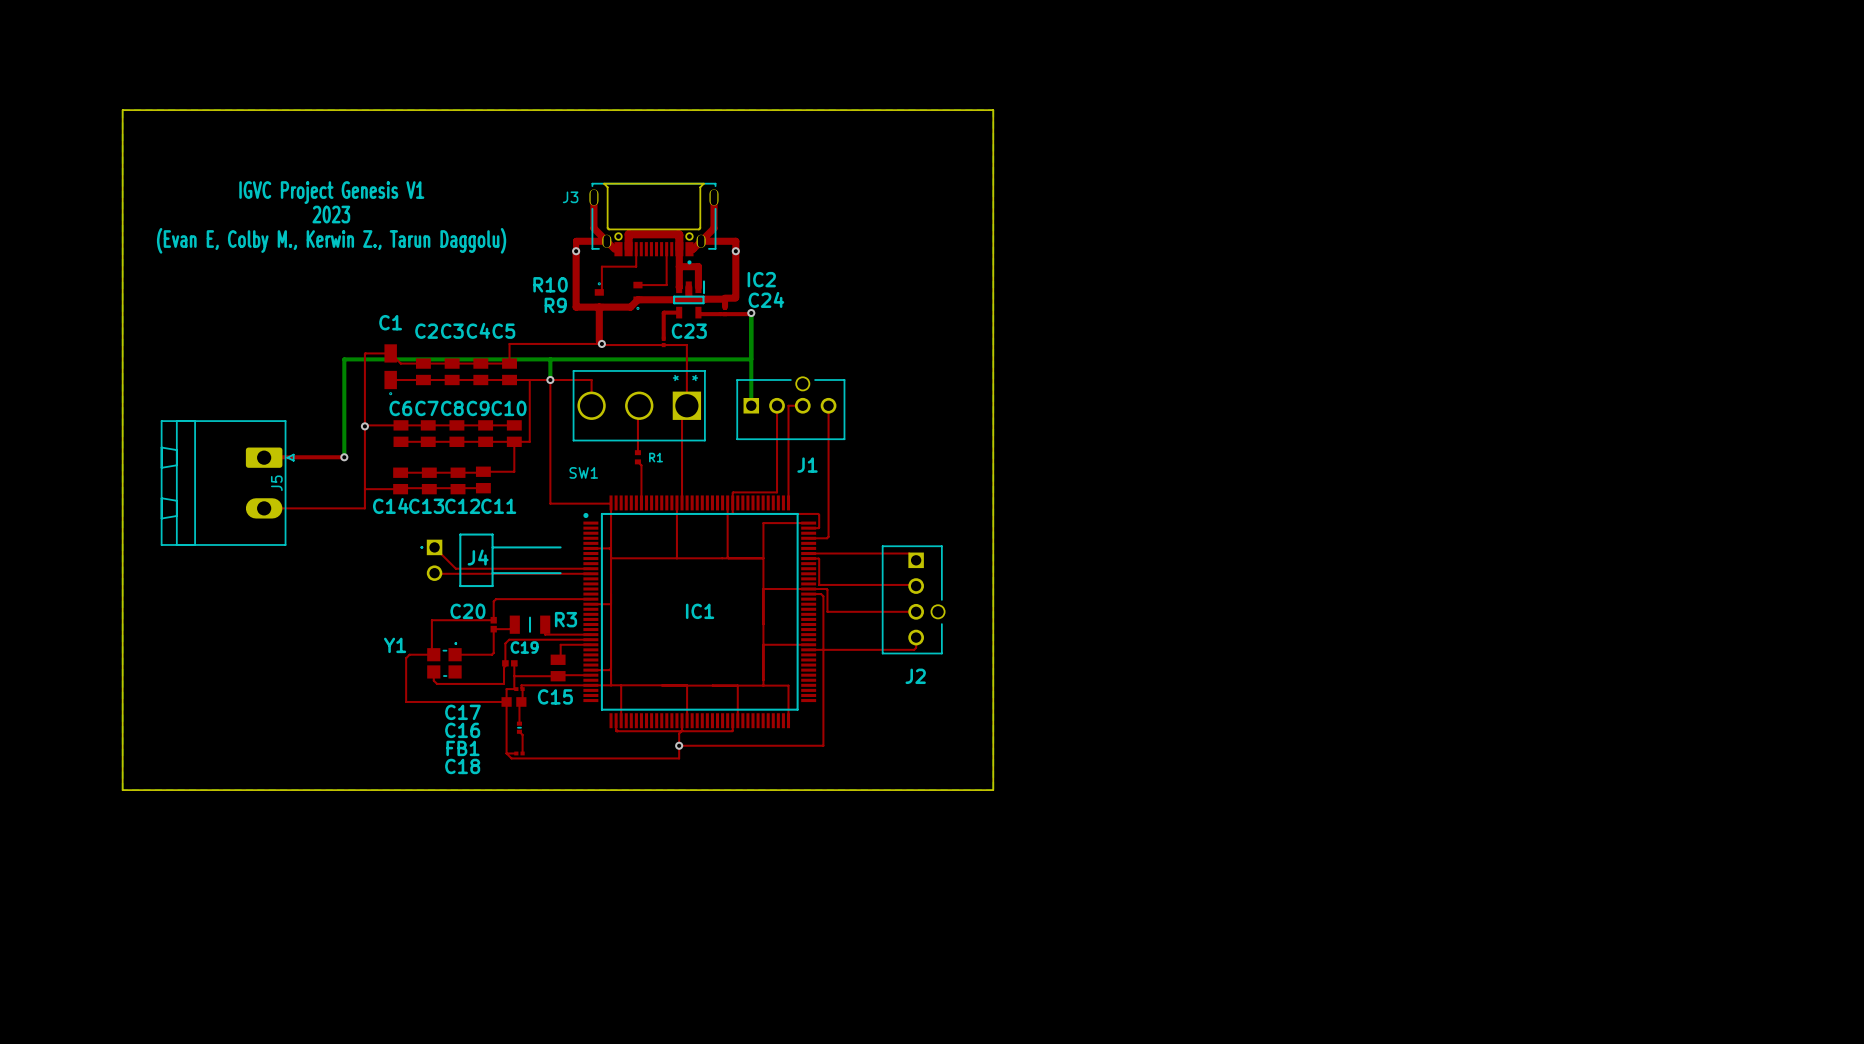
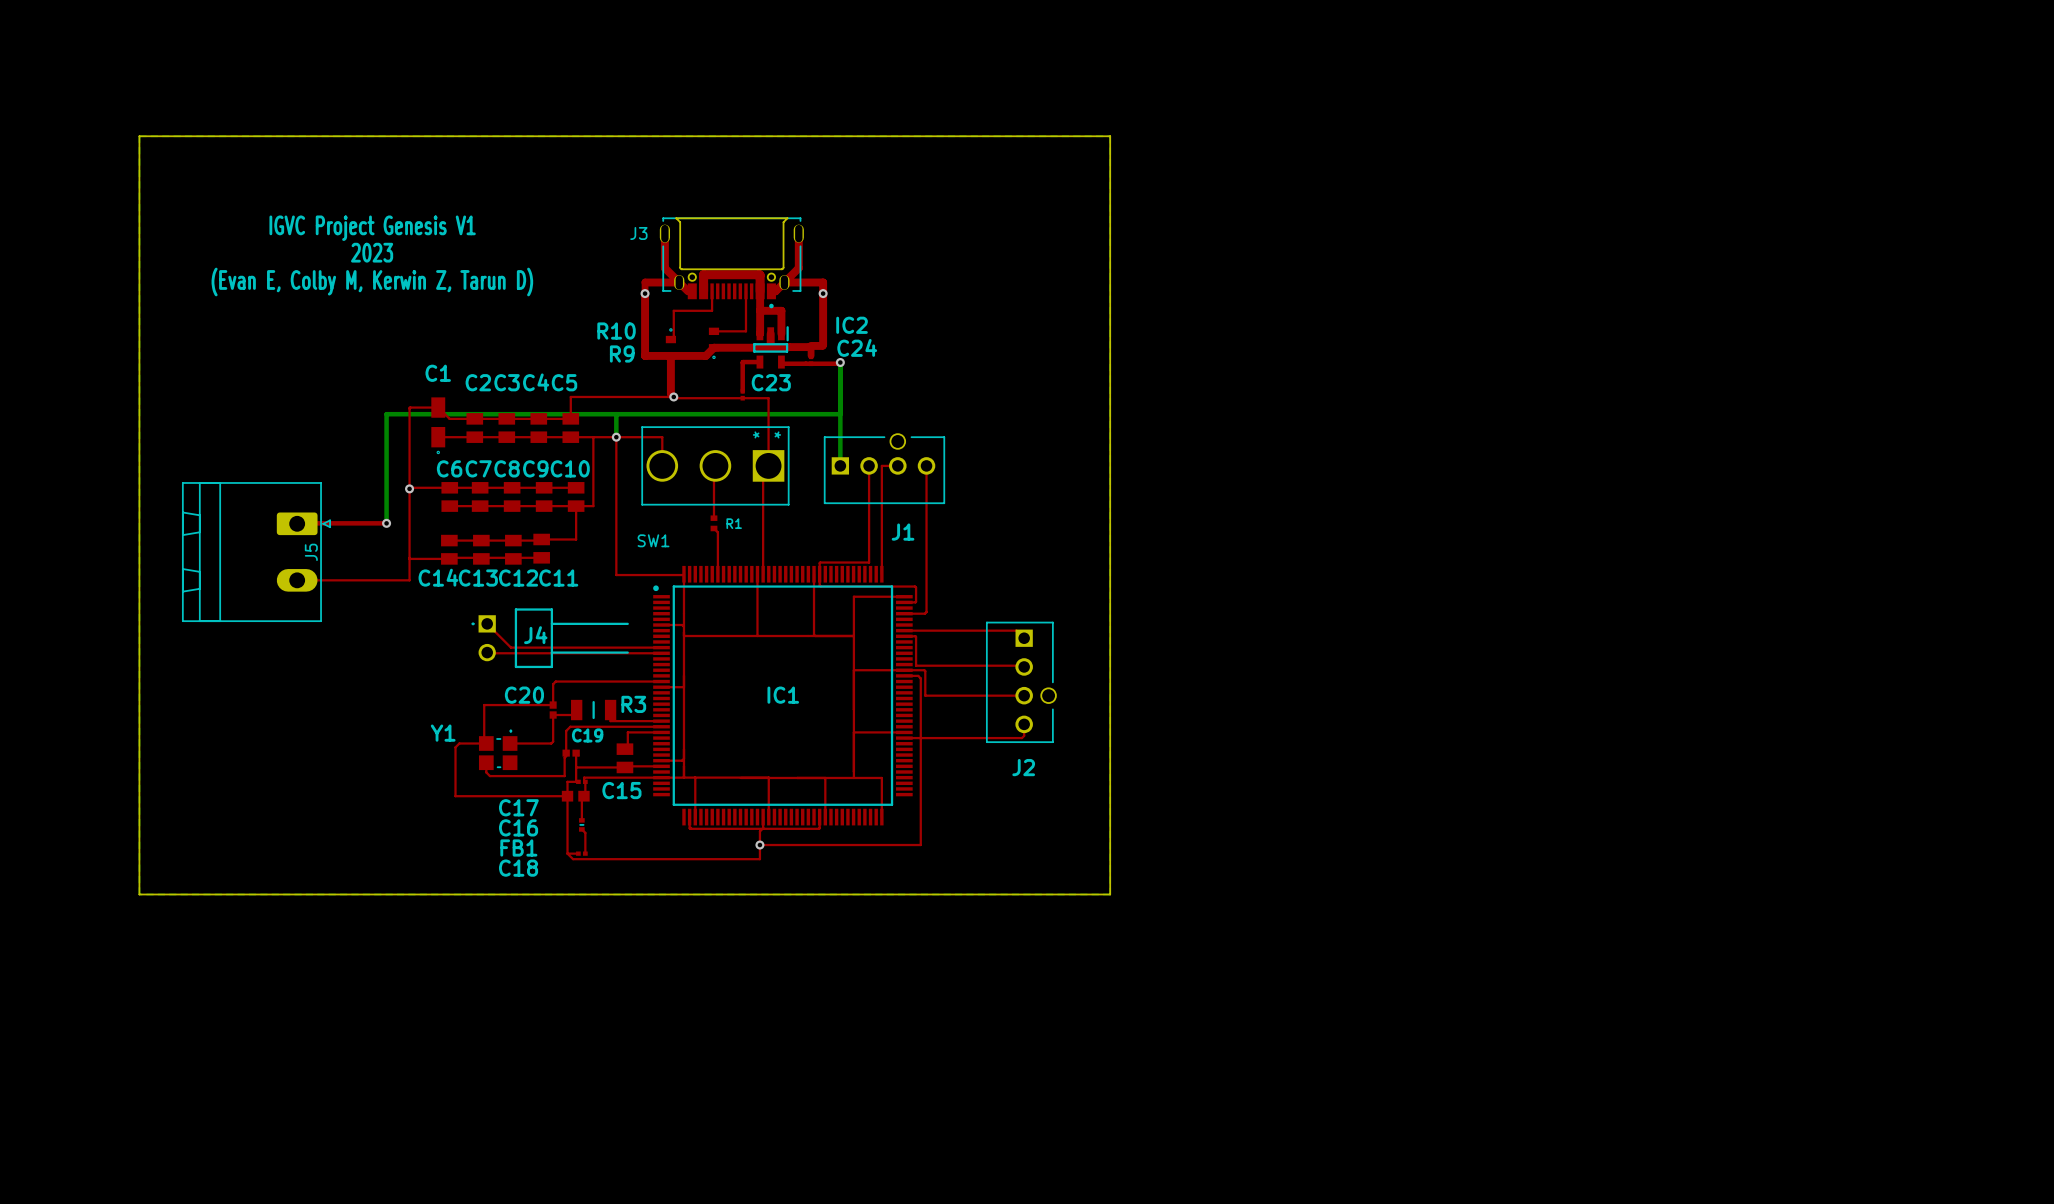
text: (Evan E, Colby M., Kerwin Z., Tarun Daggolu) (331, 240) -> (Evan E, Colby M, Kerwin Z, Tarun D) (372, 282)

